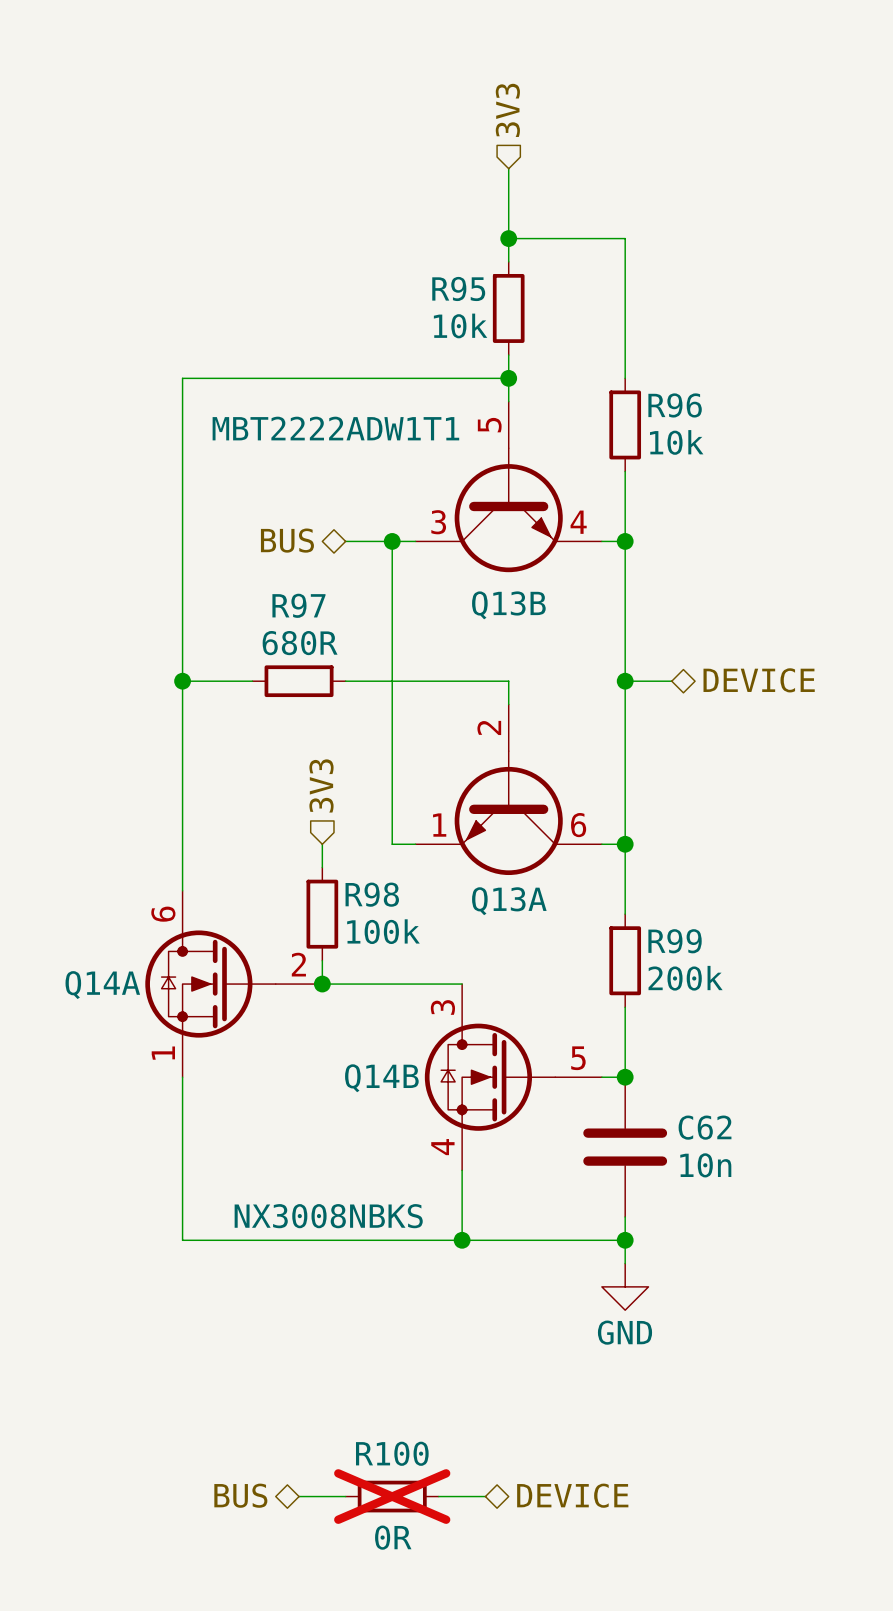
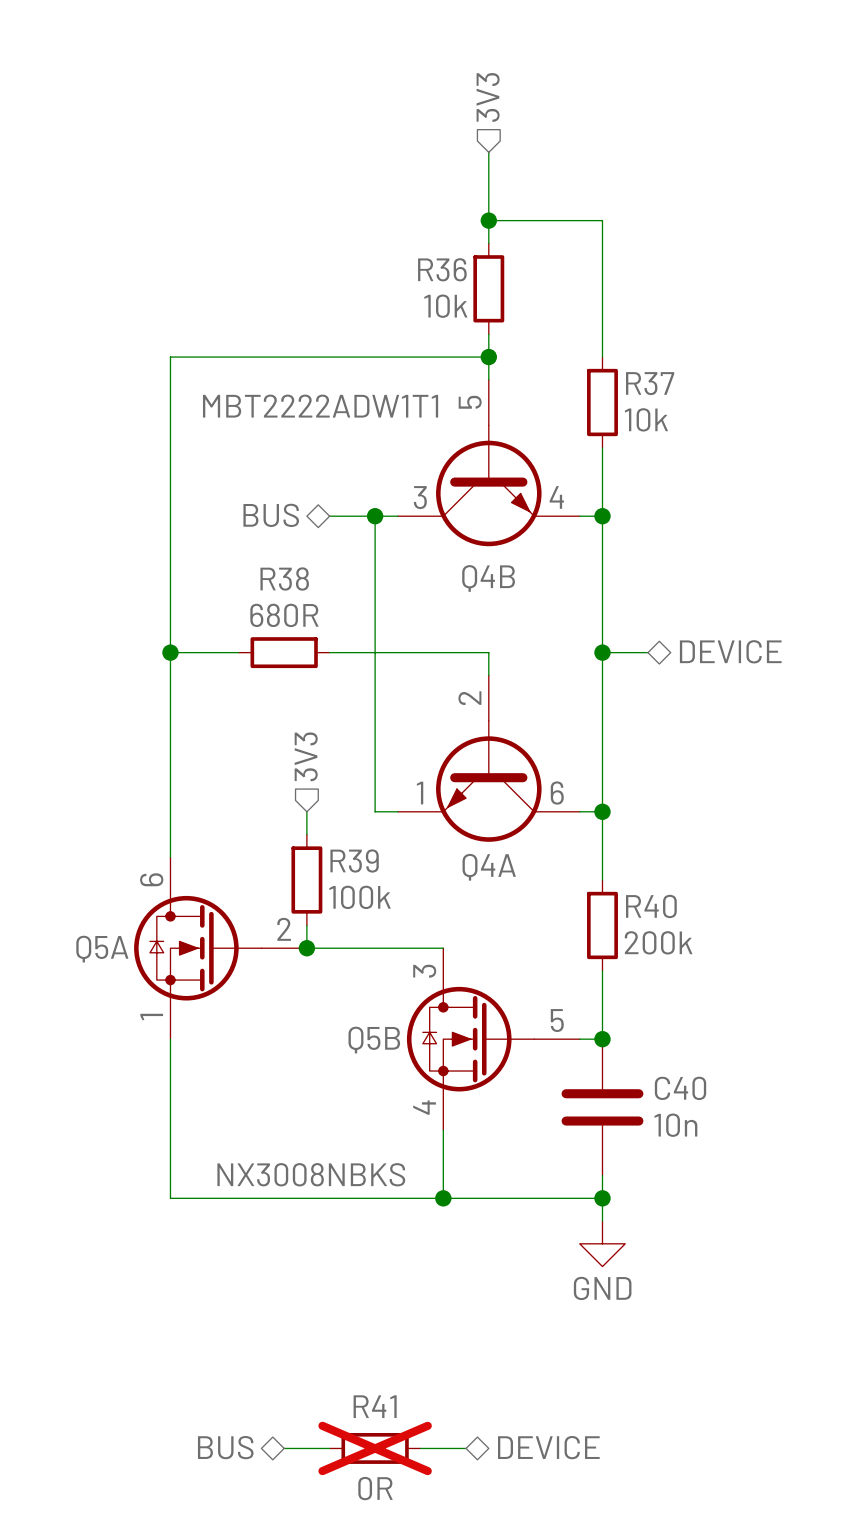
R95 name: R95 (458, 288) -> R36 (442, 269)
R96 name: R96 (675, 405) -> R37 (650, 383)
R97 name: R97 (298, 605) -> R38 (284, 578)
Q13B name: Q13B (508, 605) -> Q4B (488, 578)
R98 name: R98 (372, 894) -> R39 (354, 860)
Q13A name: Q13A (509, 901) -> Q4A (489, 867)
R99 name: R99 (675, 941) -> R40 (651, 906)
Q14A name: Q14A (102, 985) -> Q5A (102, 949)
Q14B name: Q14B (381, 1078) -> Q5B (374, 1040)
C62 name: C62 (705, 1127) -> C40 (680, 1088)
R100 name: R100 (392, 1453) -> R41 (375, 1406)

